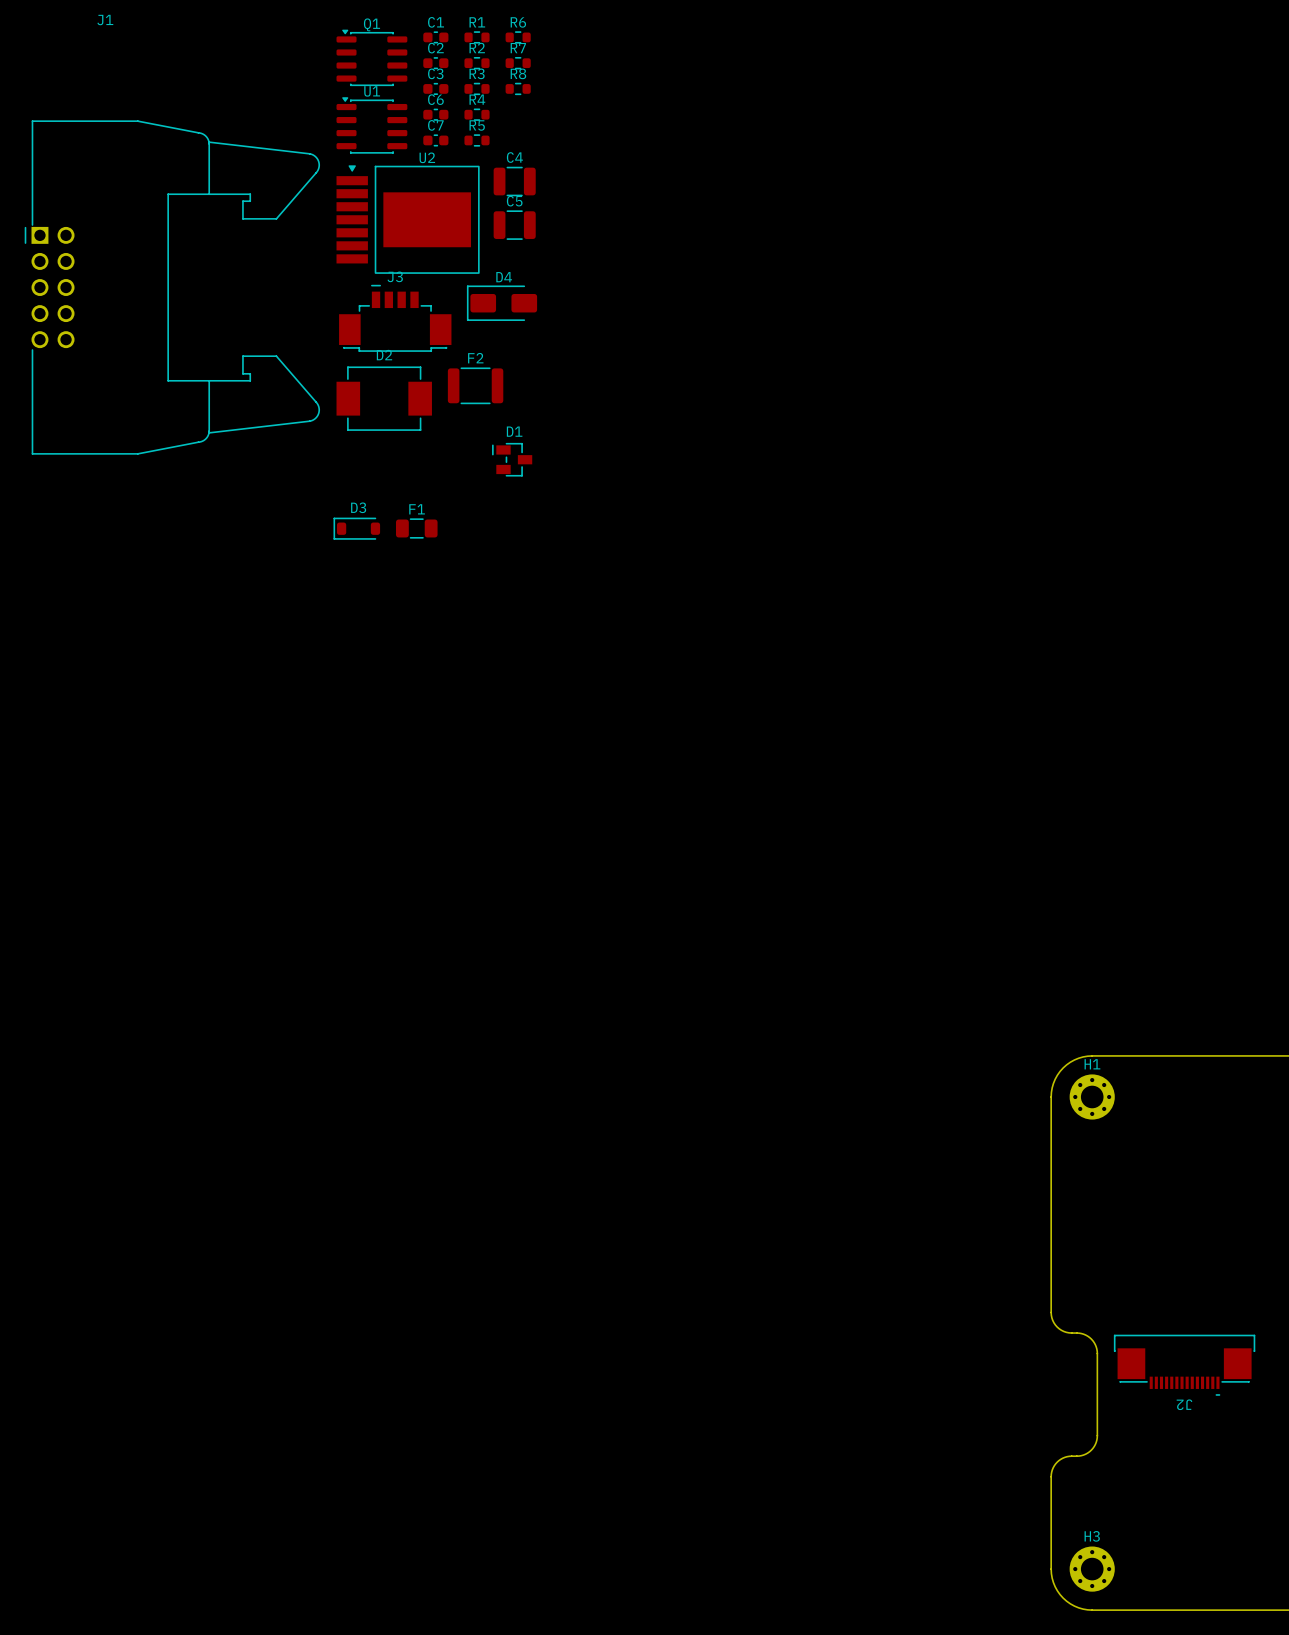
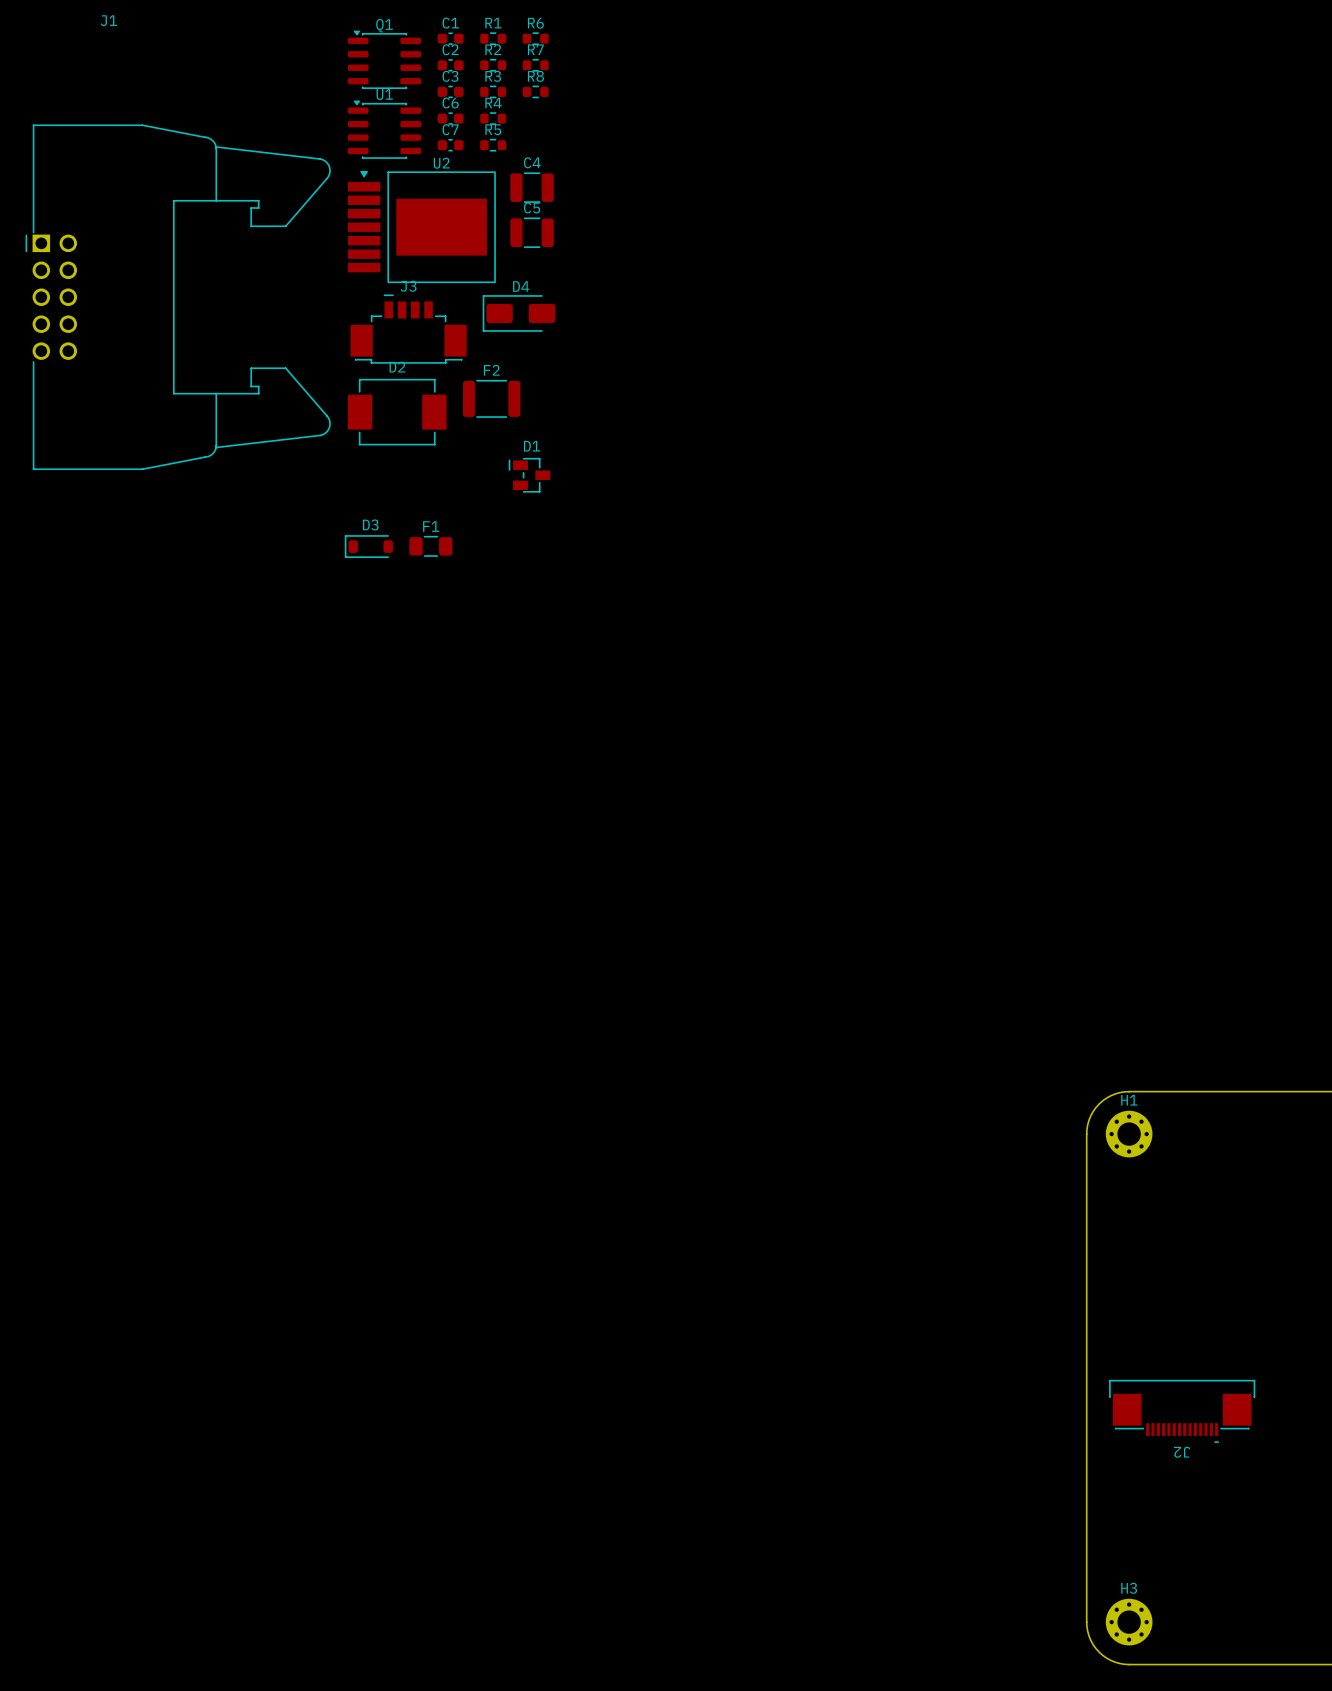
board edge: (1051, 1312) (1053, 1322) (1061, 1330) (1081, 1333) (1089, 1337) (1095, 1344) (1097, 1353) (1096, 1442) (1091, 1450) (1085, 1454) (1067, 1456) (1058, 1460) (1053, 1467) (1051, 1476) -> (1086, 1356) (1086, 1526)
J2 position: (1184, 1365) -> (1182, 1411)

